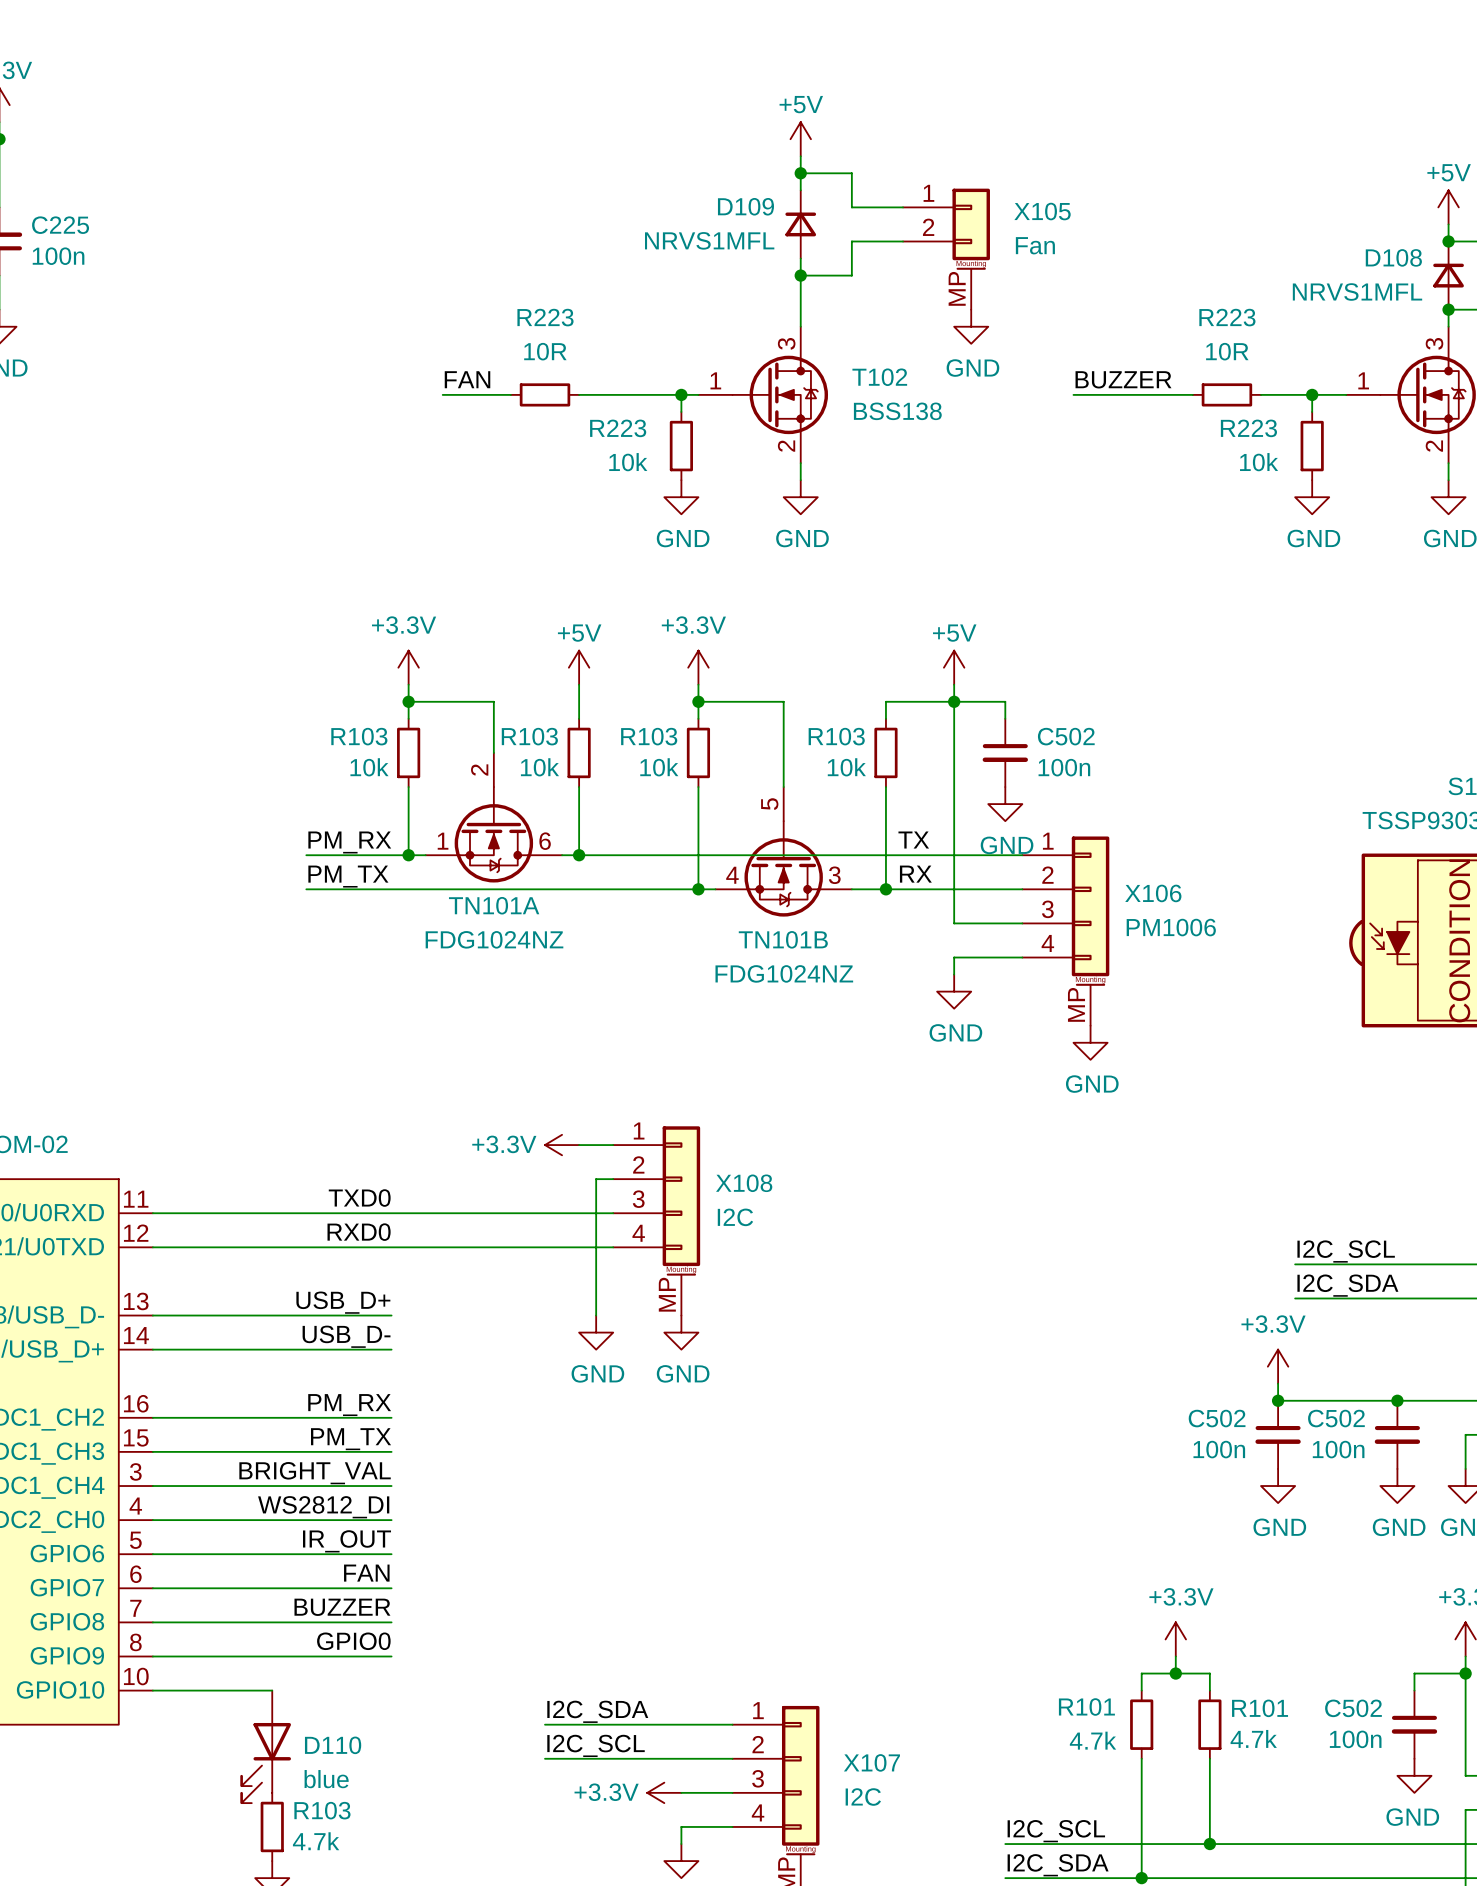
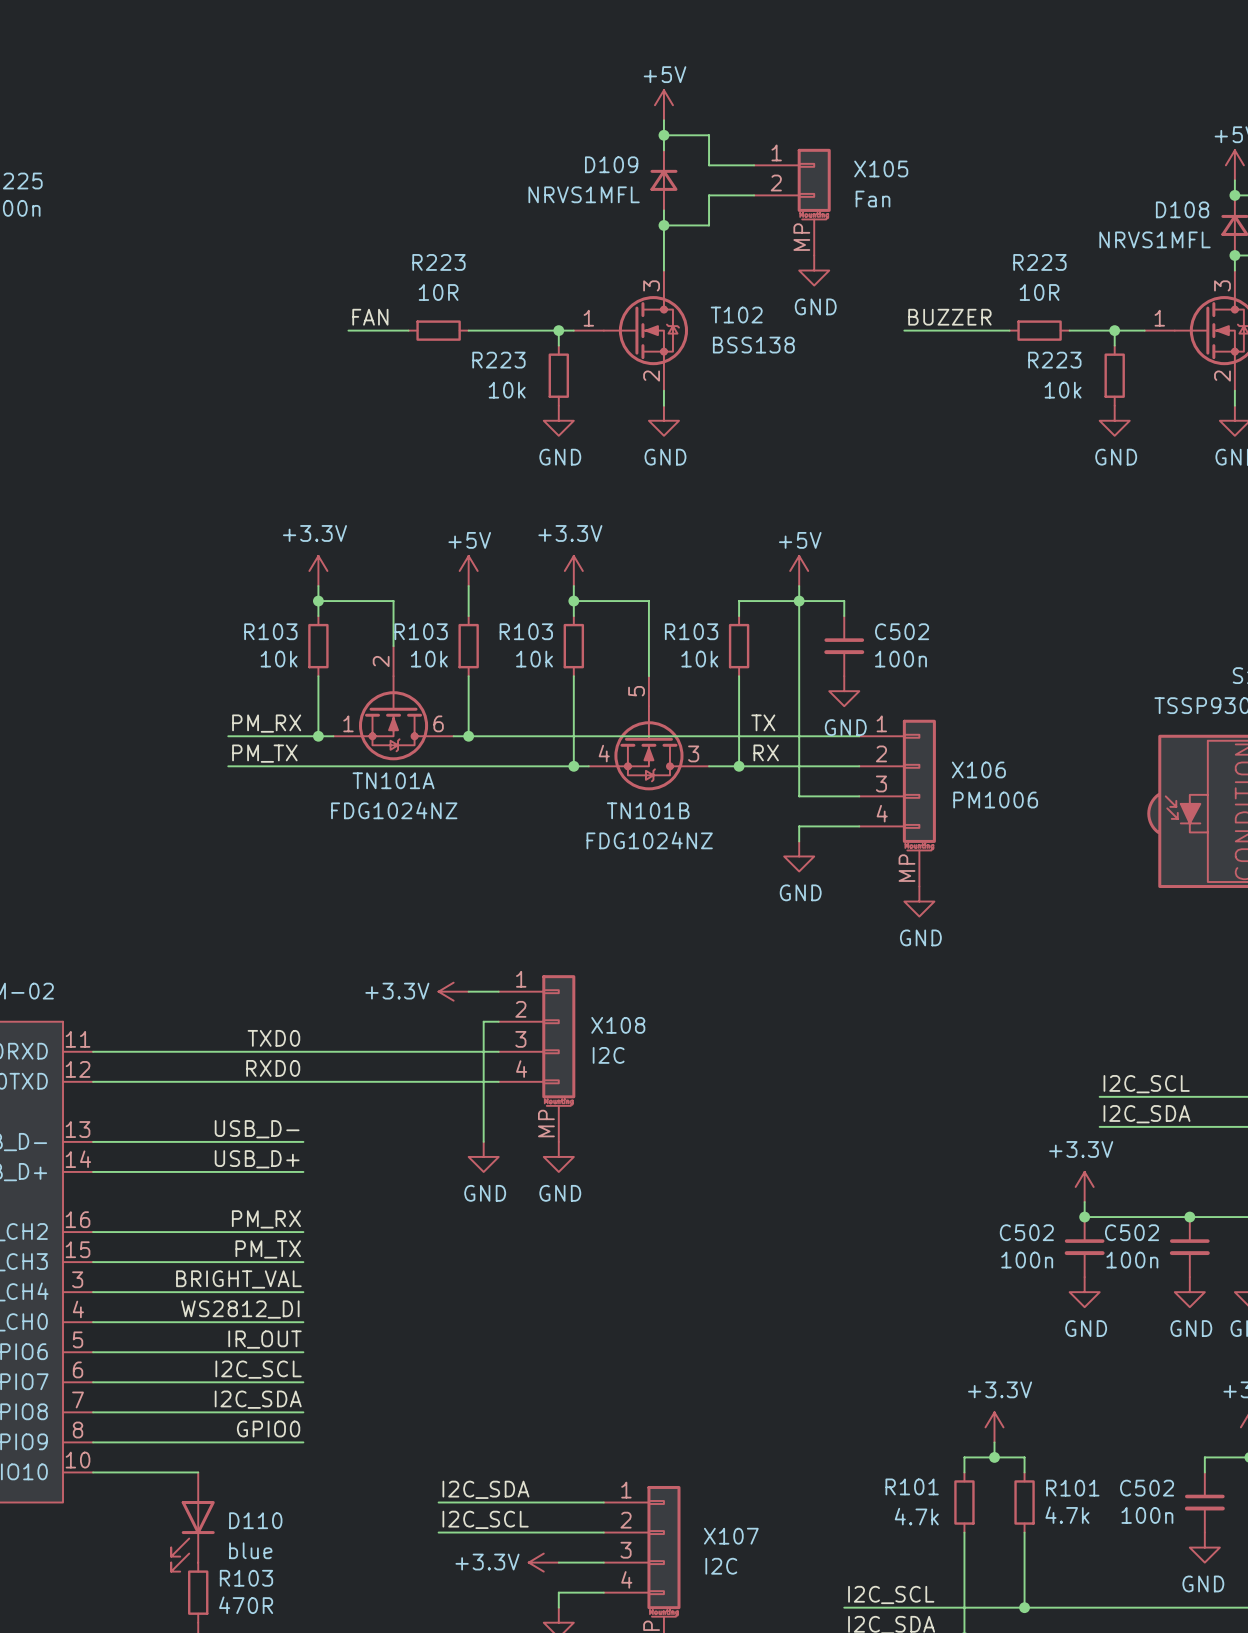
label: USB_D+ (343, 1302) -> USB_D- (257, 1129)
label: USB_D- (346, 1336) -> USB_D+ (257, 1159)
label: FAN (366, 1573) -> I2C_SCL (258, 1369)
label: BUZZER (342, 1607) -> I2C_SDA (258, 1399)
R103 value: 4.7k (316, 1841) -> 470R (246, 1605)

